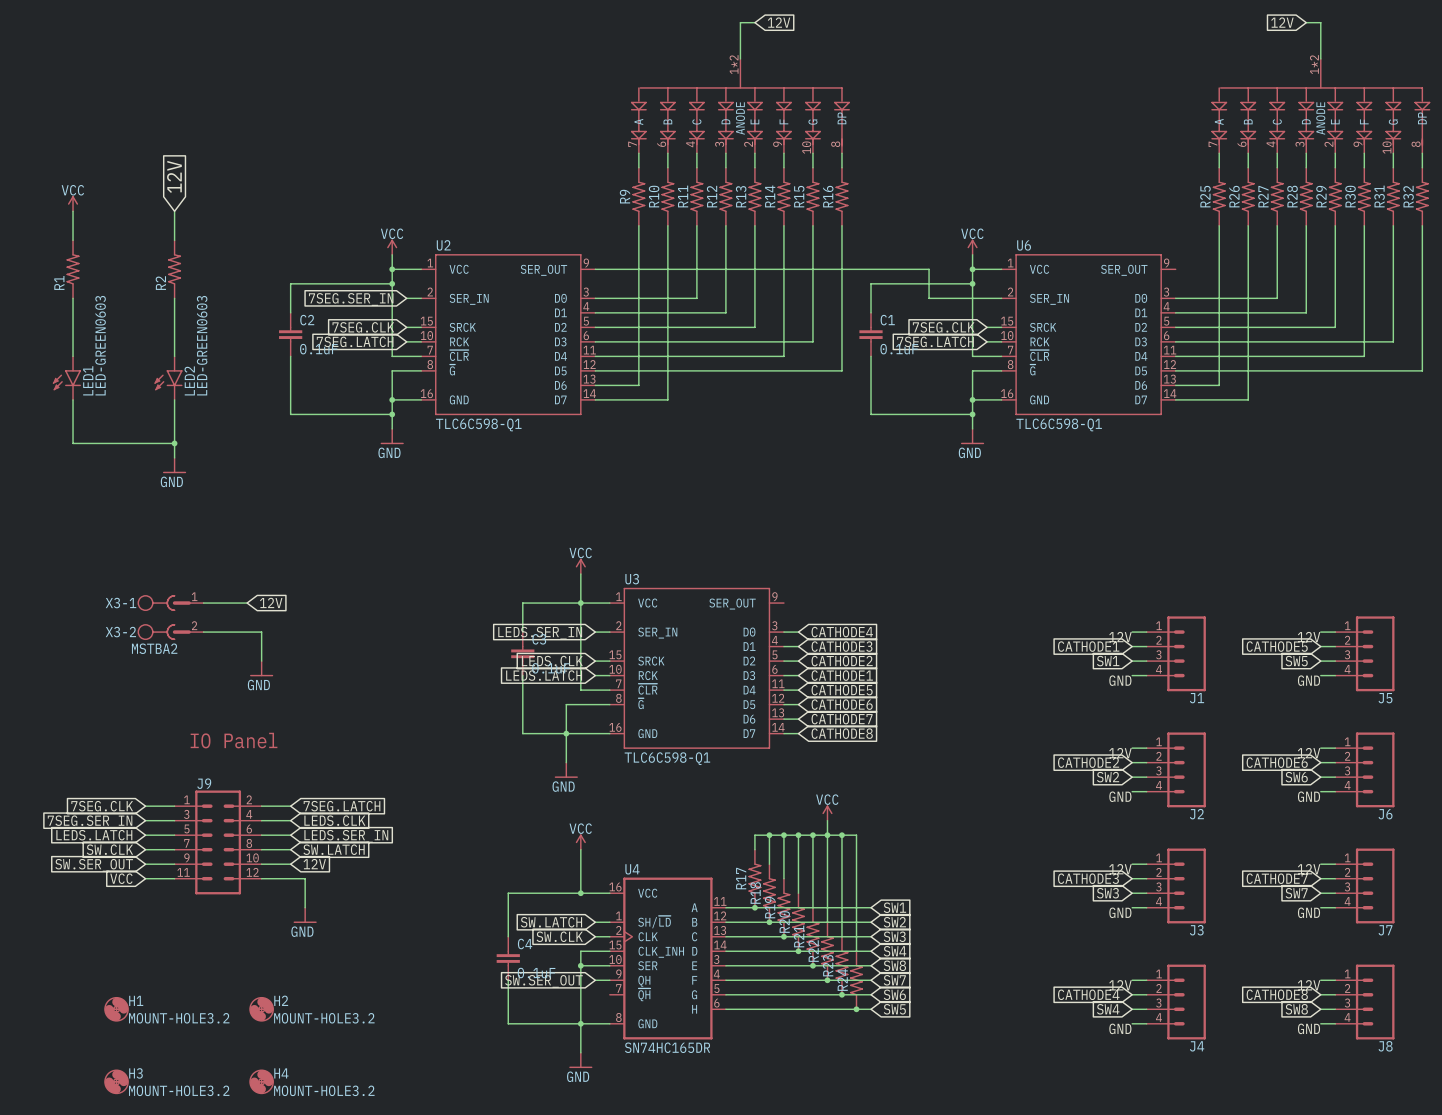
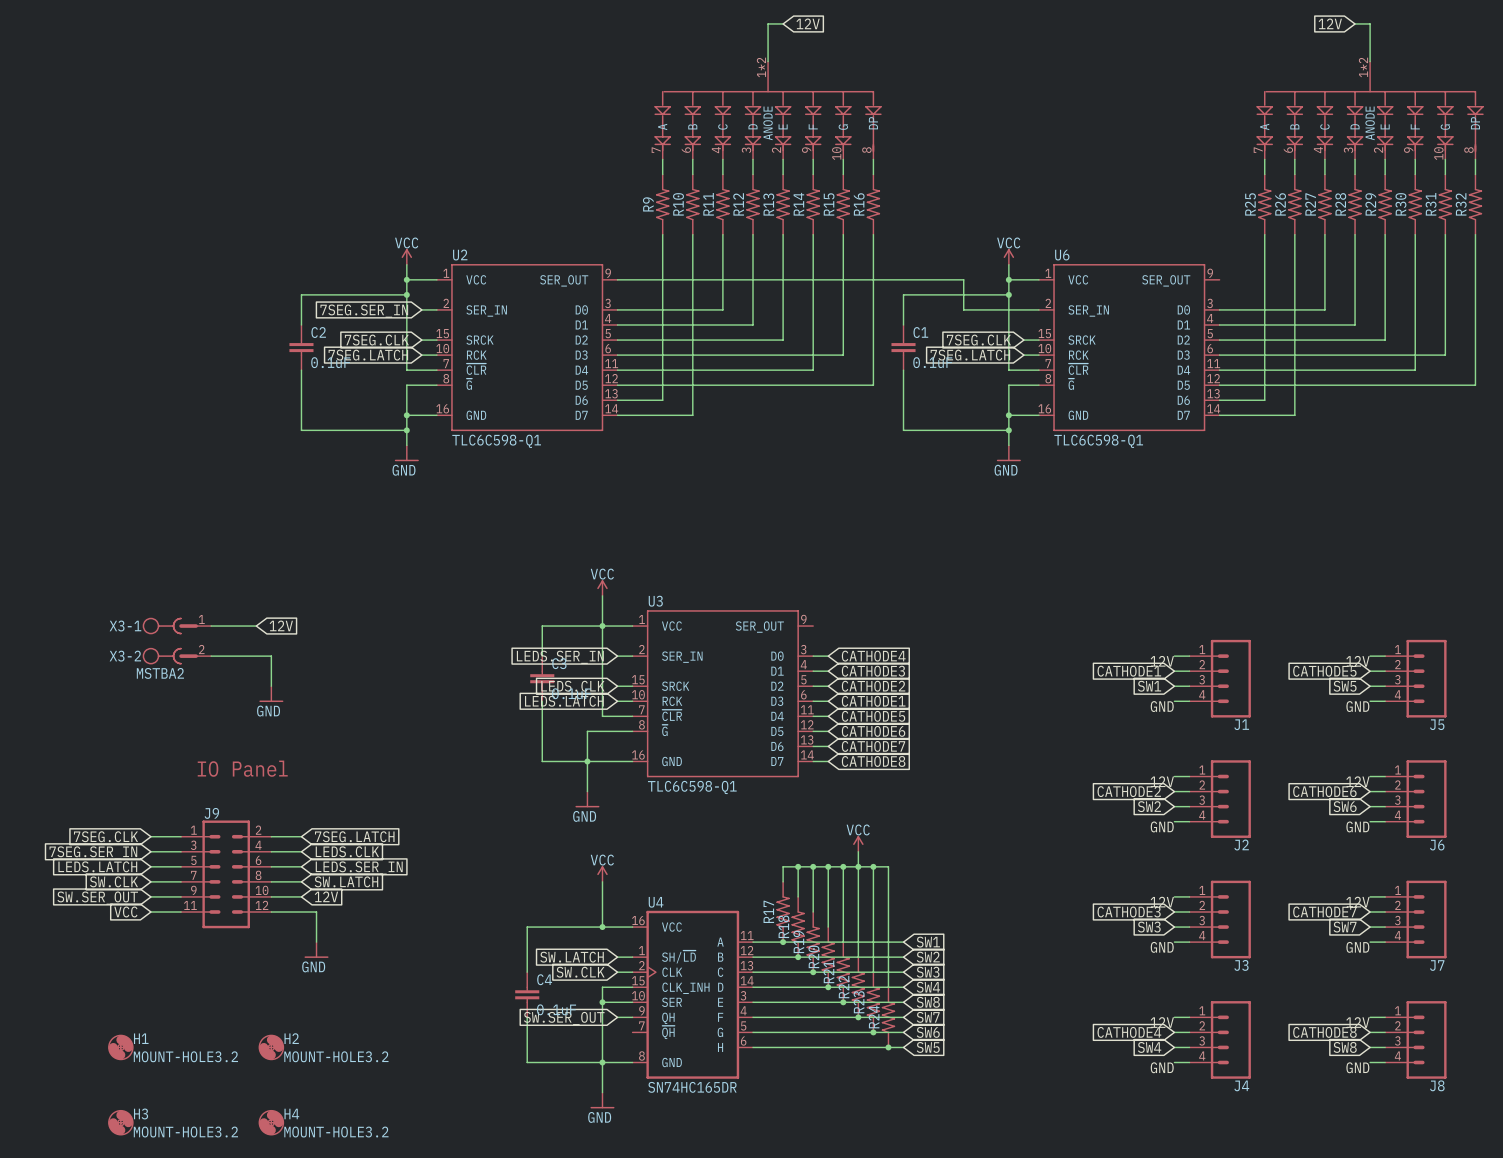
global label: 12V (174, 176) -> none
power symbol: VCC (73, 203) -> none
wire: (73, 211) (73, 240) -> none
wire: (174, 211) (174, 240) -> none
R1: (73, 269) -> none
R2: (174, 269) -> none
wire: (73, 298) (73, 356) -> none
wire: (174, 298) (174, 356) -> none
LED1: LED-GREEN0603 (66, 378) -> none
LED2: LED-GREEN0603 (168, 378) -> none
wire: (73, 399) (73, 443) (174, 443) -> none
wire: (174, 399) (174, 457) -> none
junction: (174, 443) -> none
power symbol: GND (174, 465) -> none

